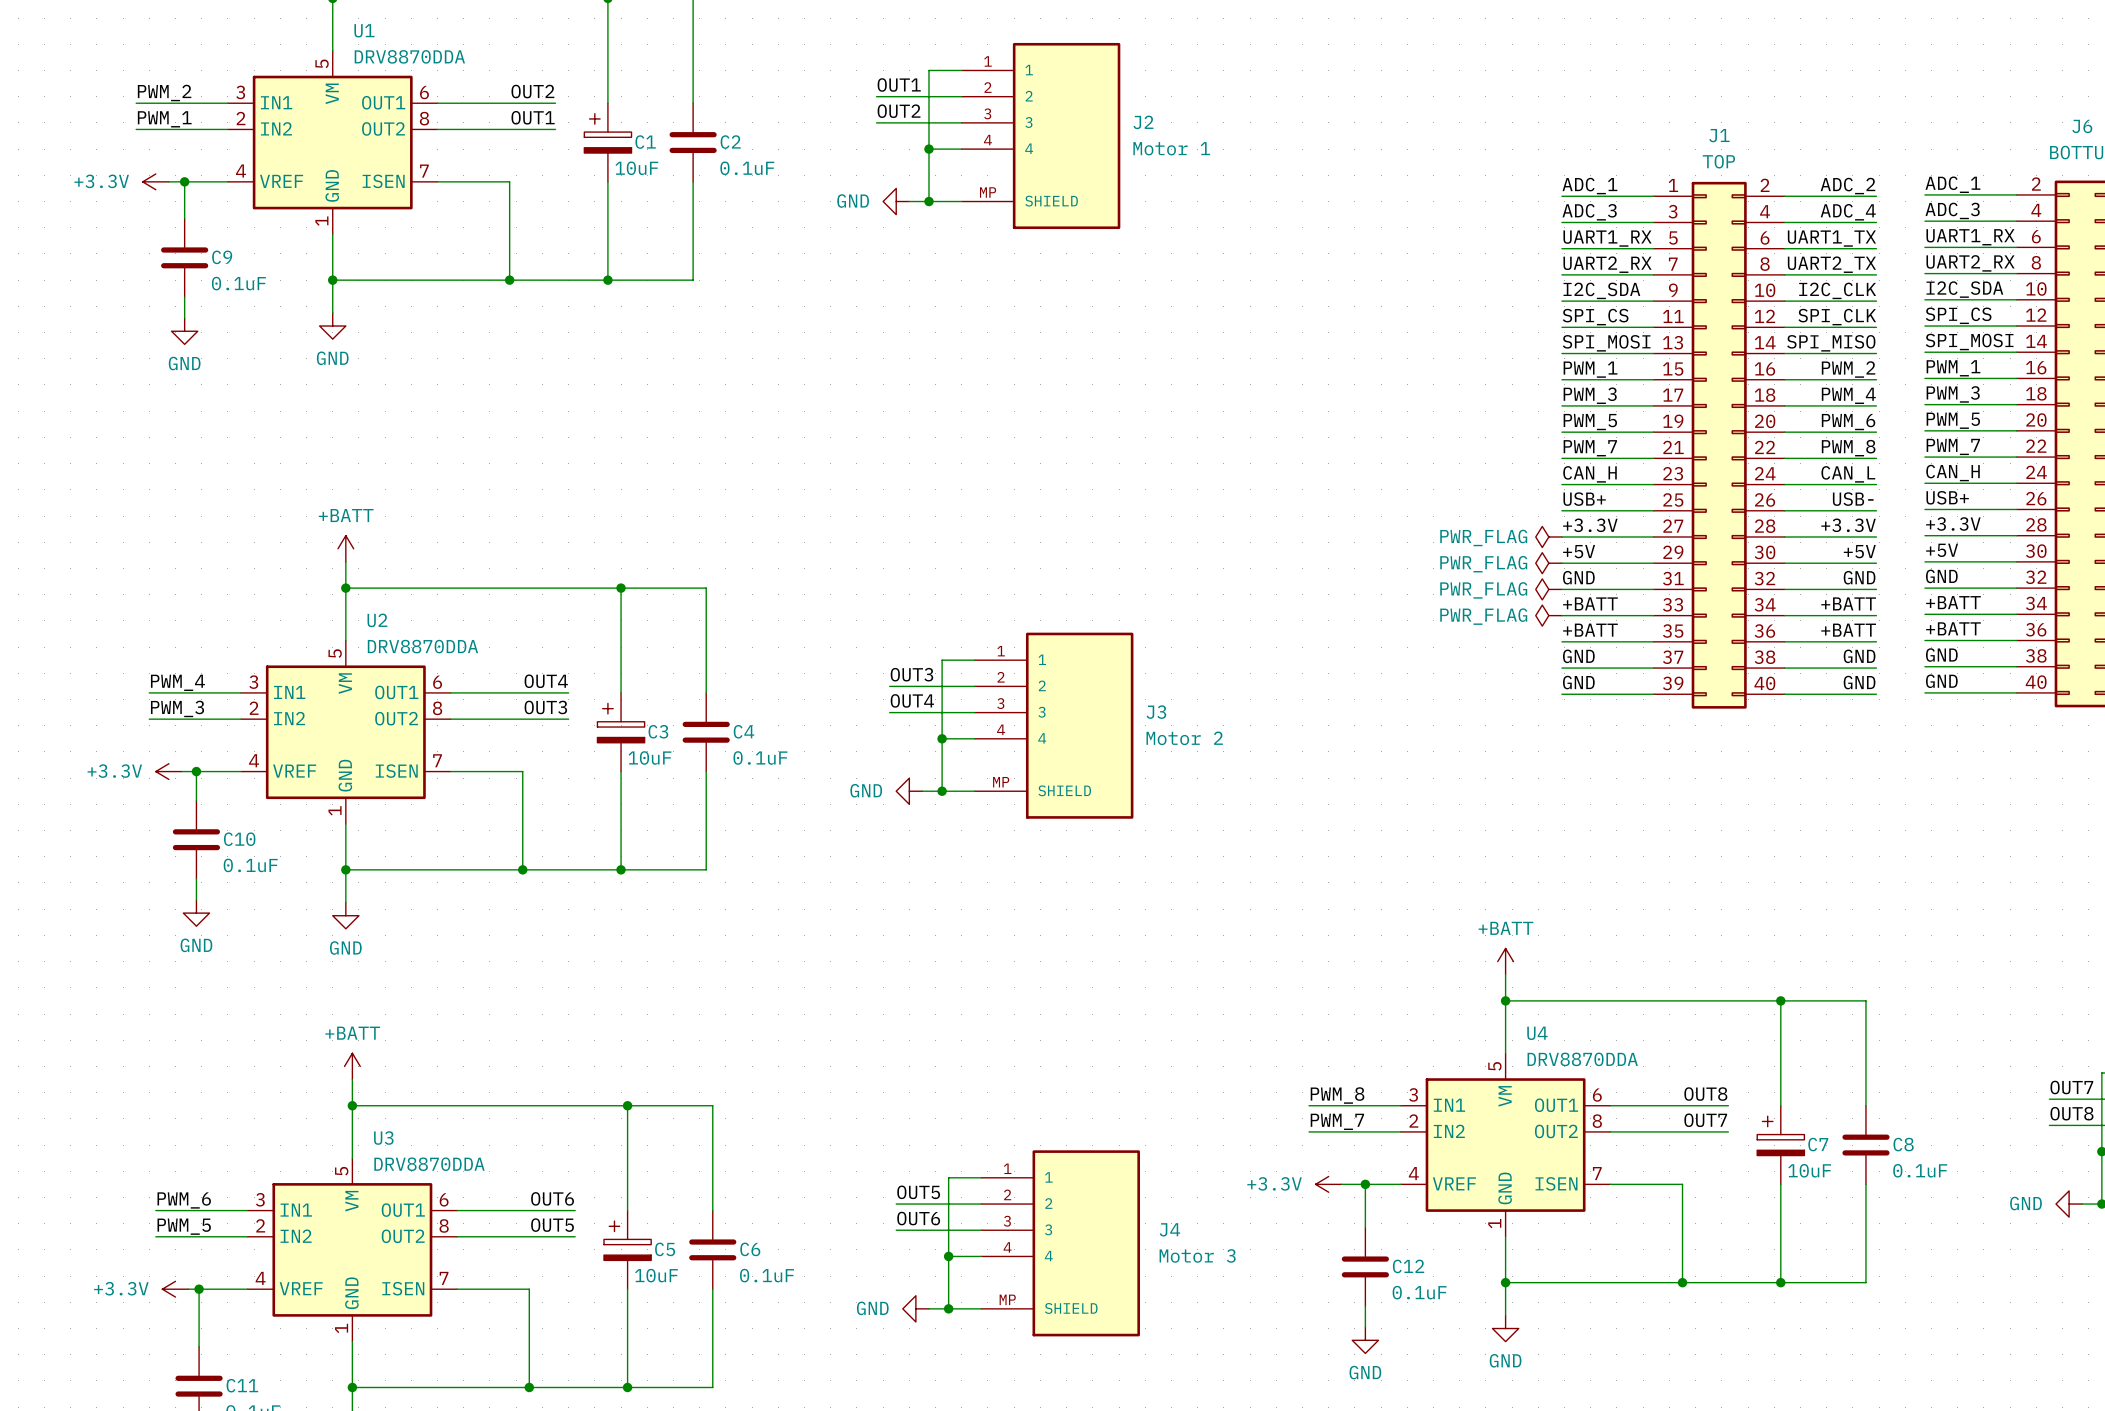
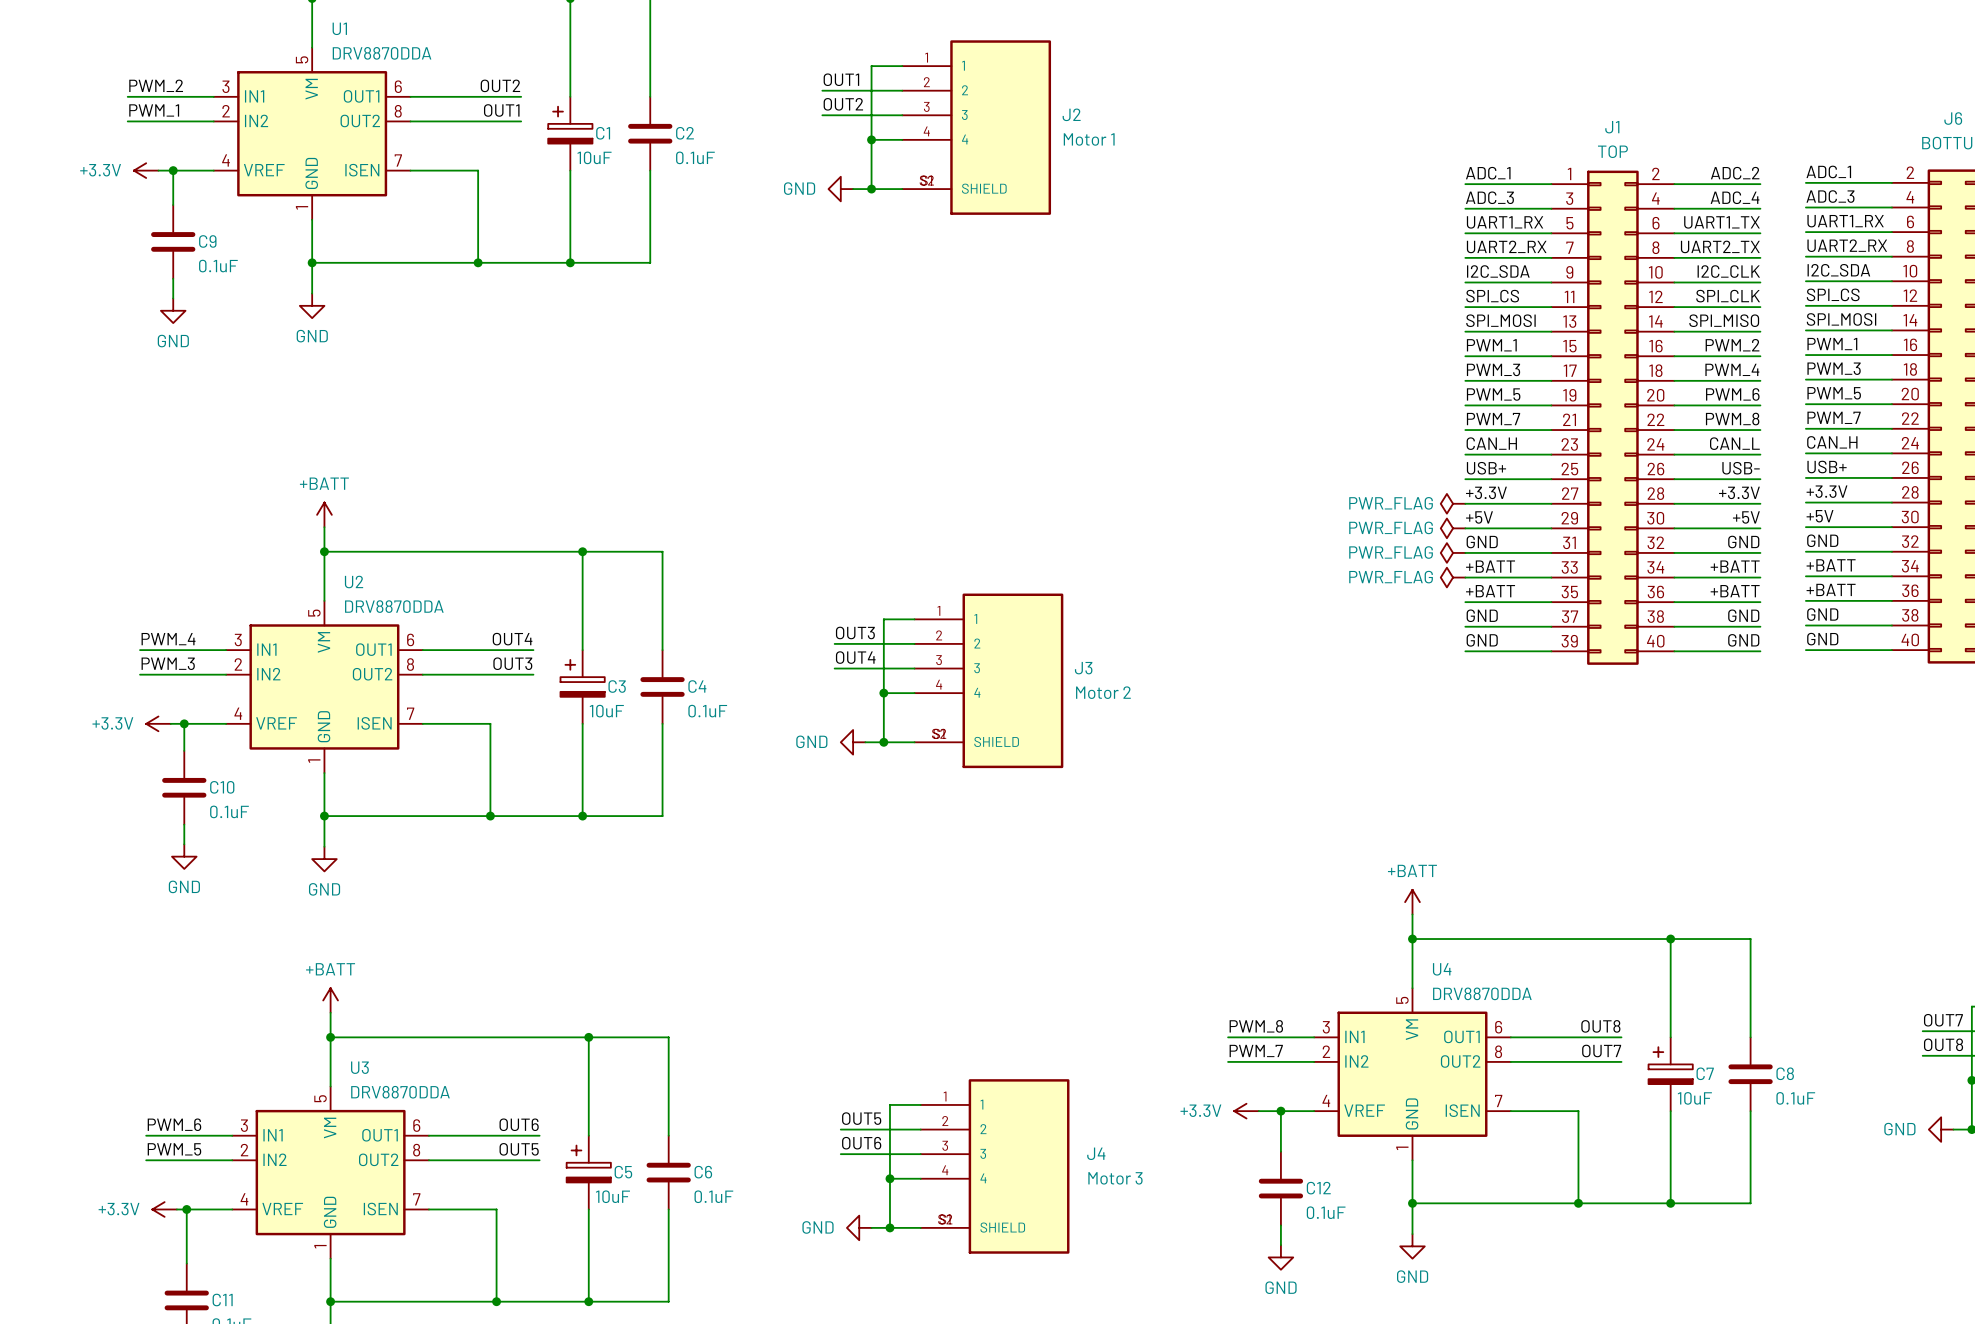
J2 symbol: [961, 42, 1121, 230] -> [902, 40, 1052, 215]
J3 symbol: [974, 632, 1134, 819] -> [914, 593, 1064, 769]
J4 symbol: [981, 1150, 1140, 1337] -> [920, 1079, 1070, 1254]

